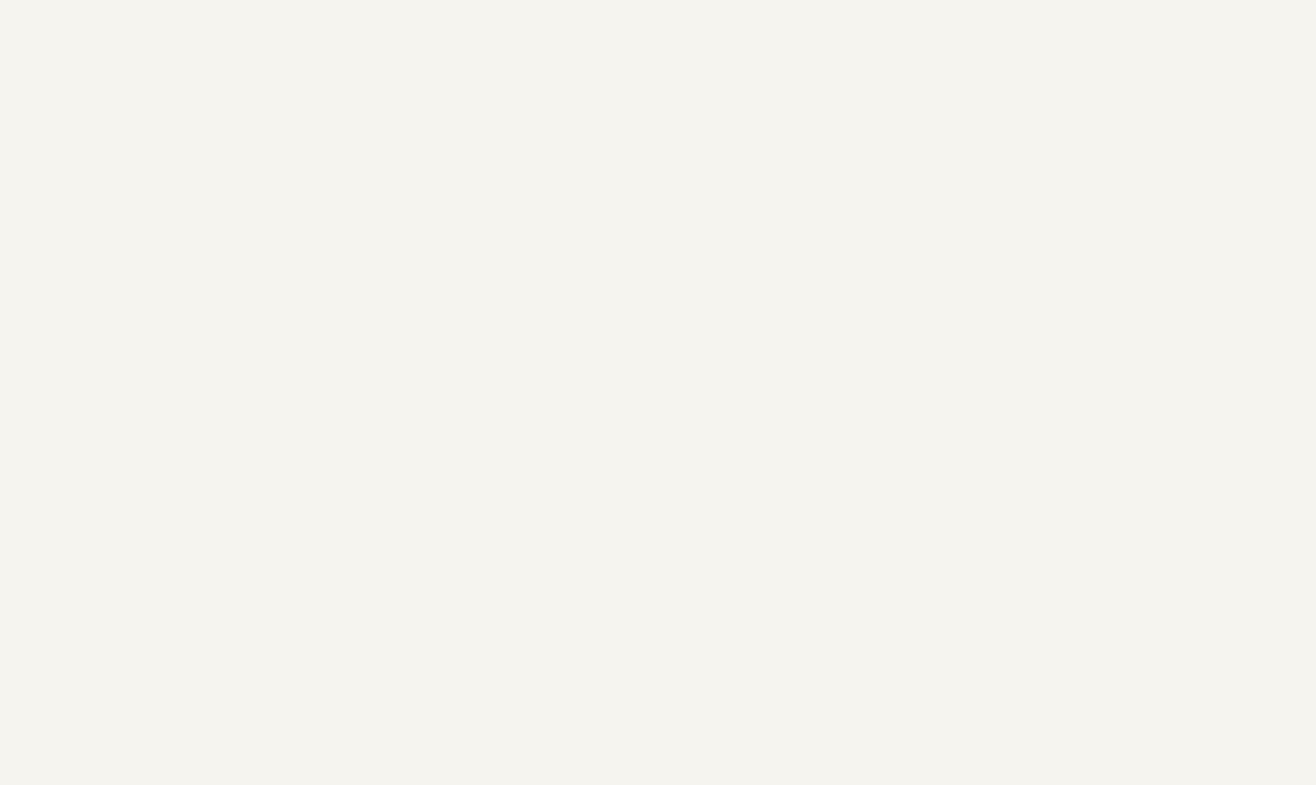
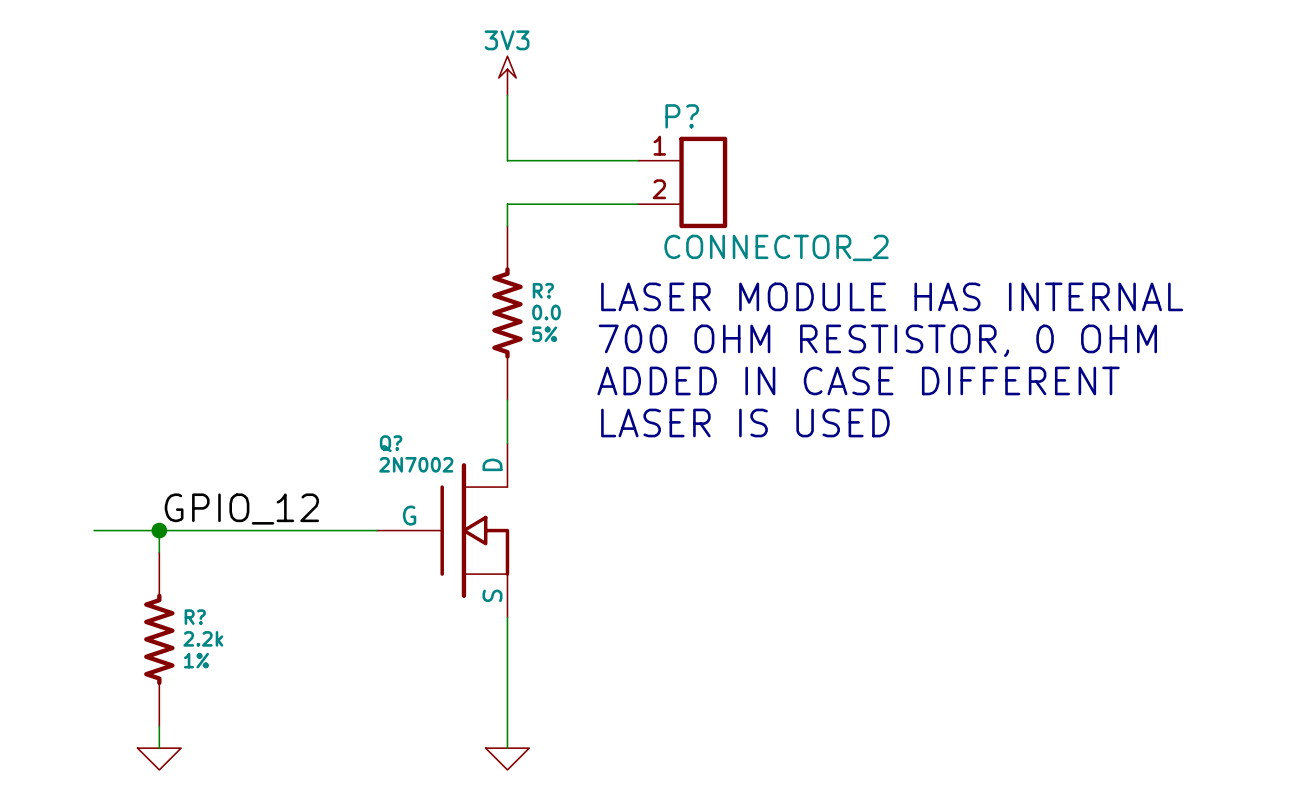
power symbol: none -> 3V3 (507, 75)
wire: none -> (507, 95) (507, 160) (638, 160)
P?: none -> CONNECTOR_2 (682, 182)
wire: none -> (638, 204) (507, 204) (507, 225)
text: none -> LASER MODULE HAS INTERNAL (892, 296)
R?: none -> 0.0 (507, 312)
text: none -> 700 OHM RESTISTOR, 0 OHM (877, 340)
text: none -> ADDED IN CASE DIFFERENT (858, 380)
wire: none -> (507, 400) (507, 443)
text: none -> LASER IS USED (745, 423)
label: none -> GPIO_12 (241, 509)
wire: none -> (94, 530) (376, 530)
wire: none -> (159, 530) (159, 552)
junction: none -> (159, 530)
Q?: none -> 2N7002 (443, 530)
wire: none -> (507, 617) (507, 748)
R?: none -> 2.2k (159, 639)
wire: none -> (159, 726) (159, 748)
power symbol: none -> (159, 759)
power symbol: none -> (507, 759)

